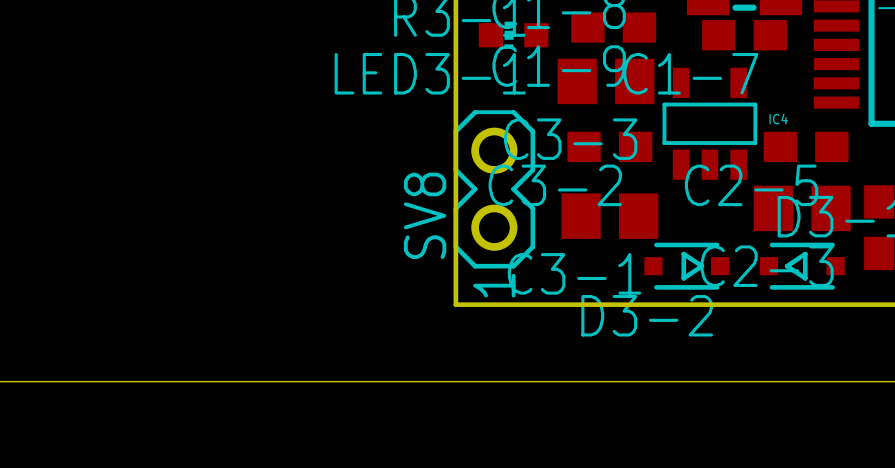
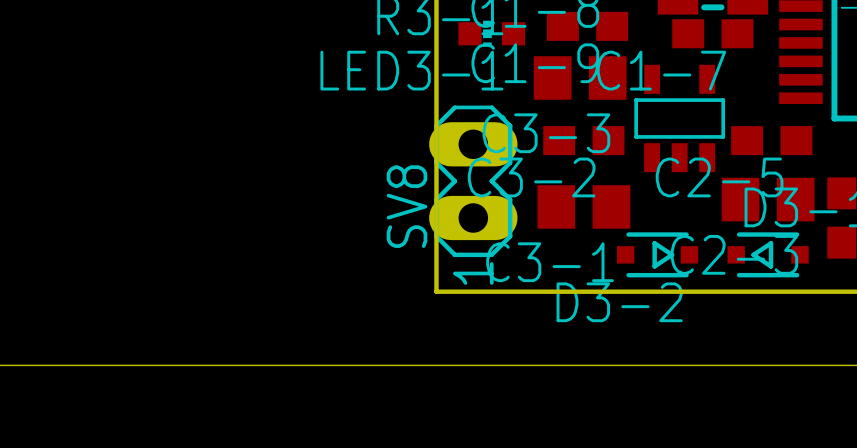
SV8 footprint: [453, 109, 536, 269] -> [429, 105, 518, 258]
IC4 name: IC4 (778, 118) -> none

